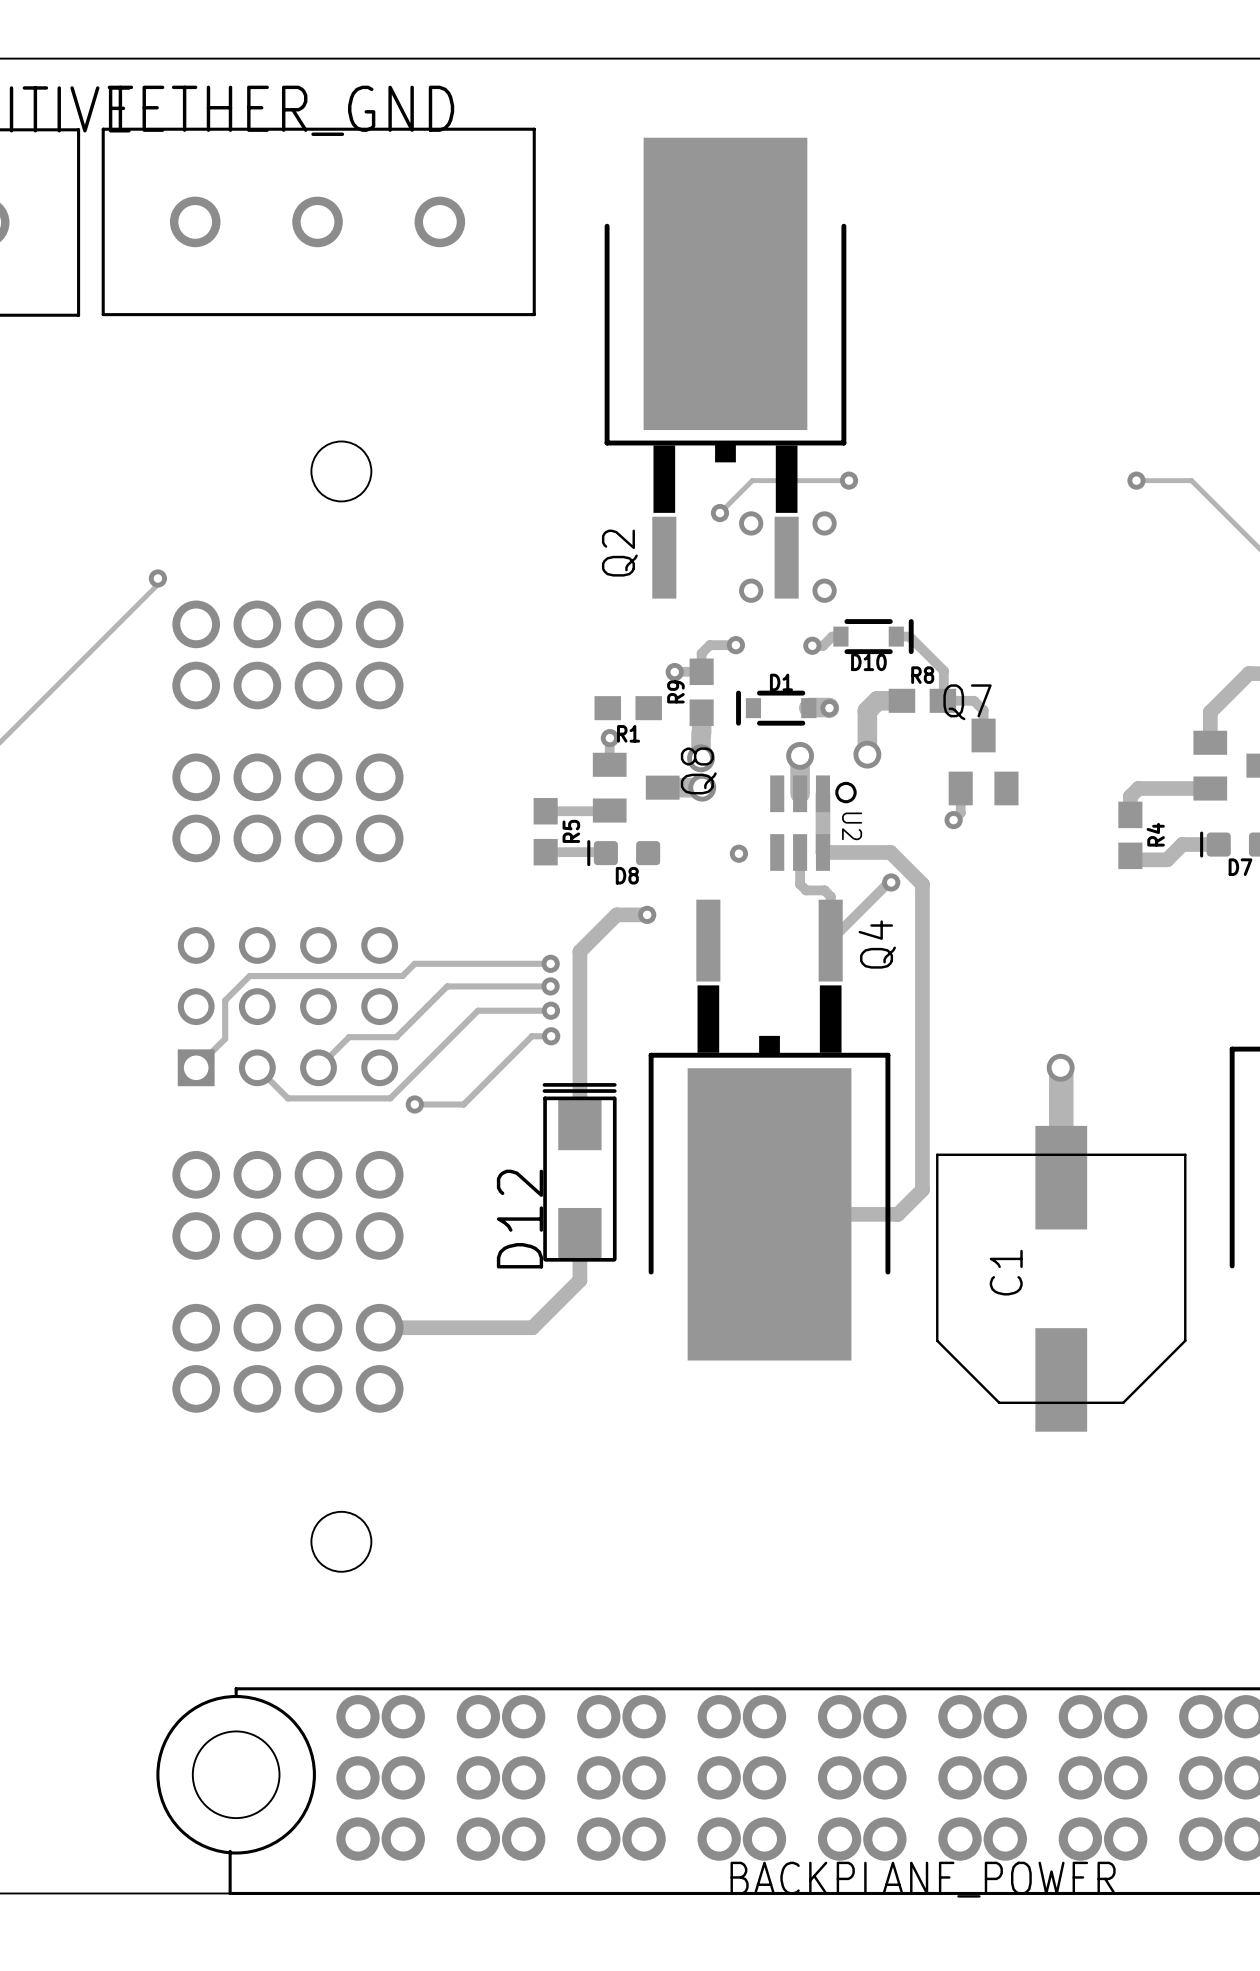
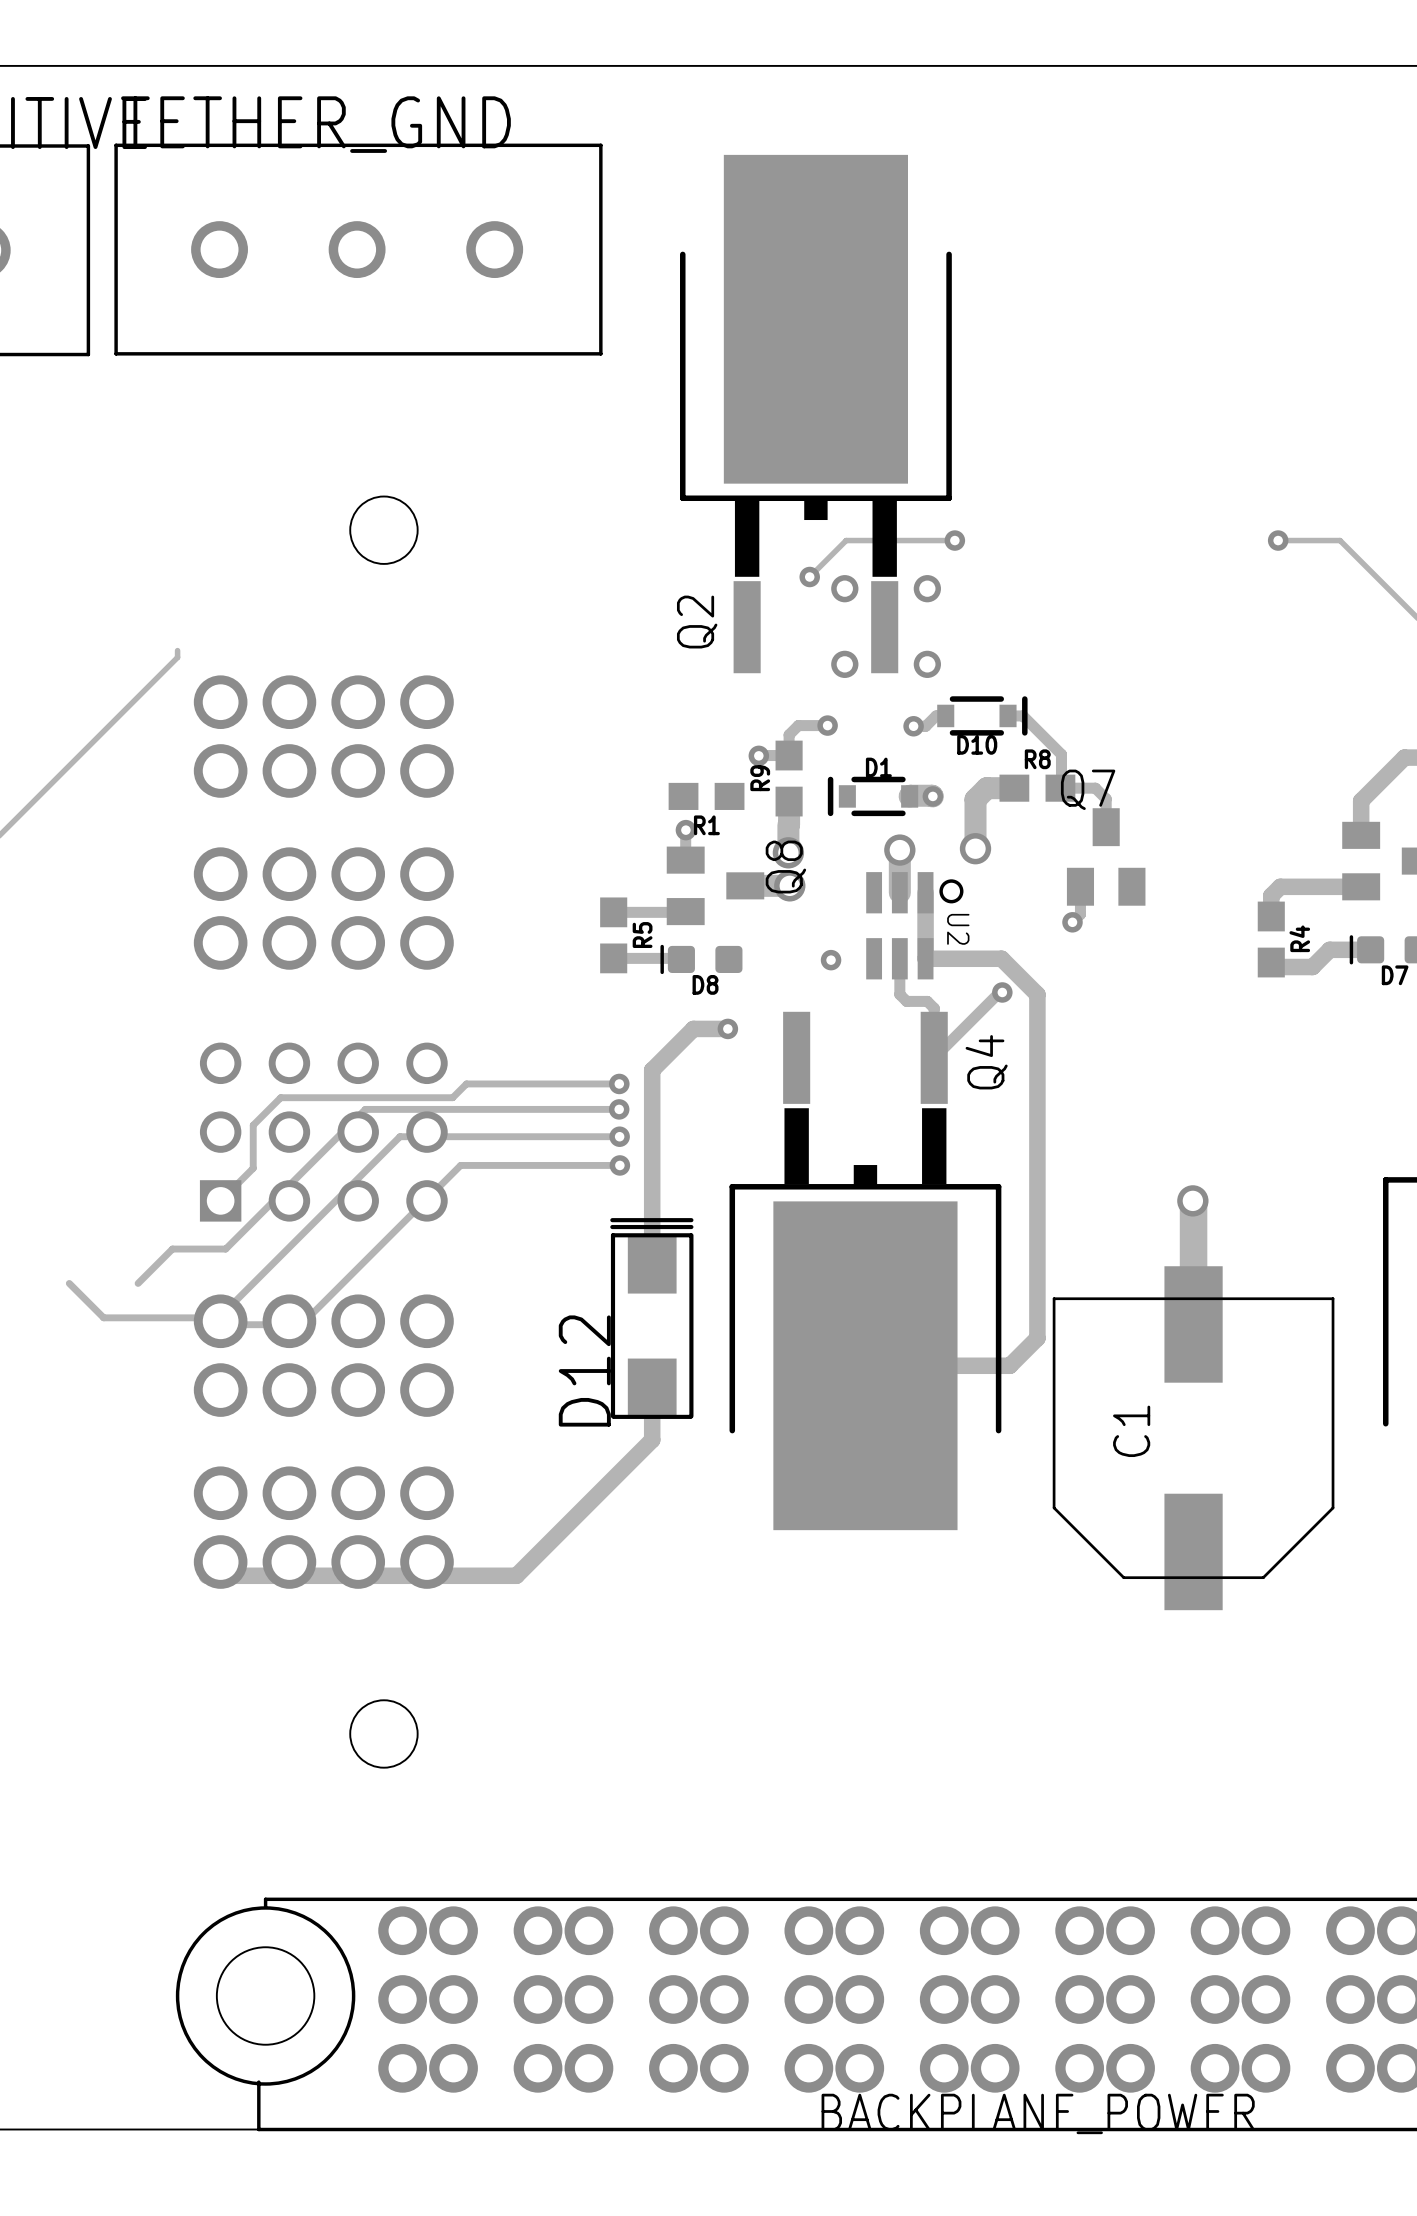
via: (157, 578) -> none
track: (447, 986) (396, 1037) (349, 1037) (318, 1067) -> (502, 1109) (365, 1109) (225, 1249) (172, 1249) (138, 1283)
track: (477, 1010) (390, 1098) (287, 1098) (257, 1067) -> (537, 1136) (399, 1136) (218, 1317) (103, 1317) (69, 1283)
track: (531, 1036) (463, 1104) (414, 1104) -> (598, 1165) (460, 1165) (301, 1324) (246, 1324)
via: (414, 1104) -> none
track: (379, 1327) (532, 1327) -> (206, 1575) (516, 1575) (598, 1493)

